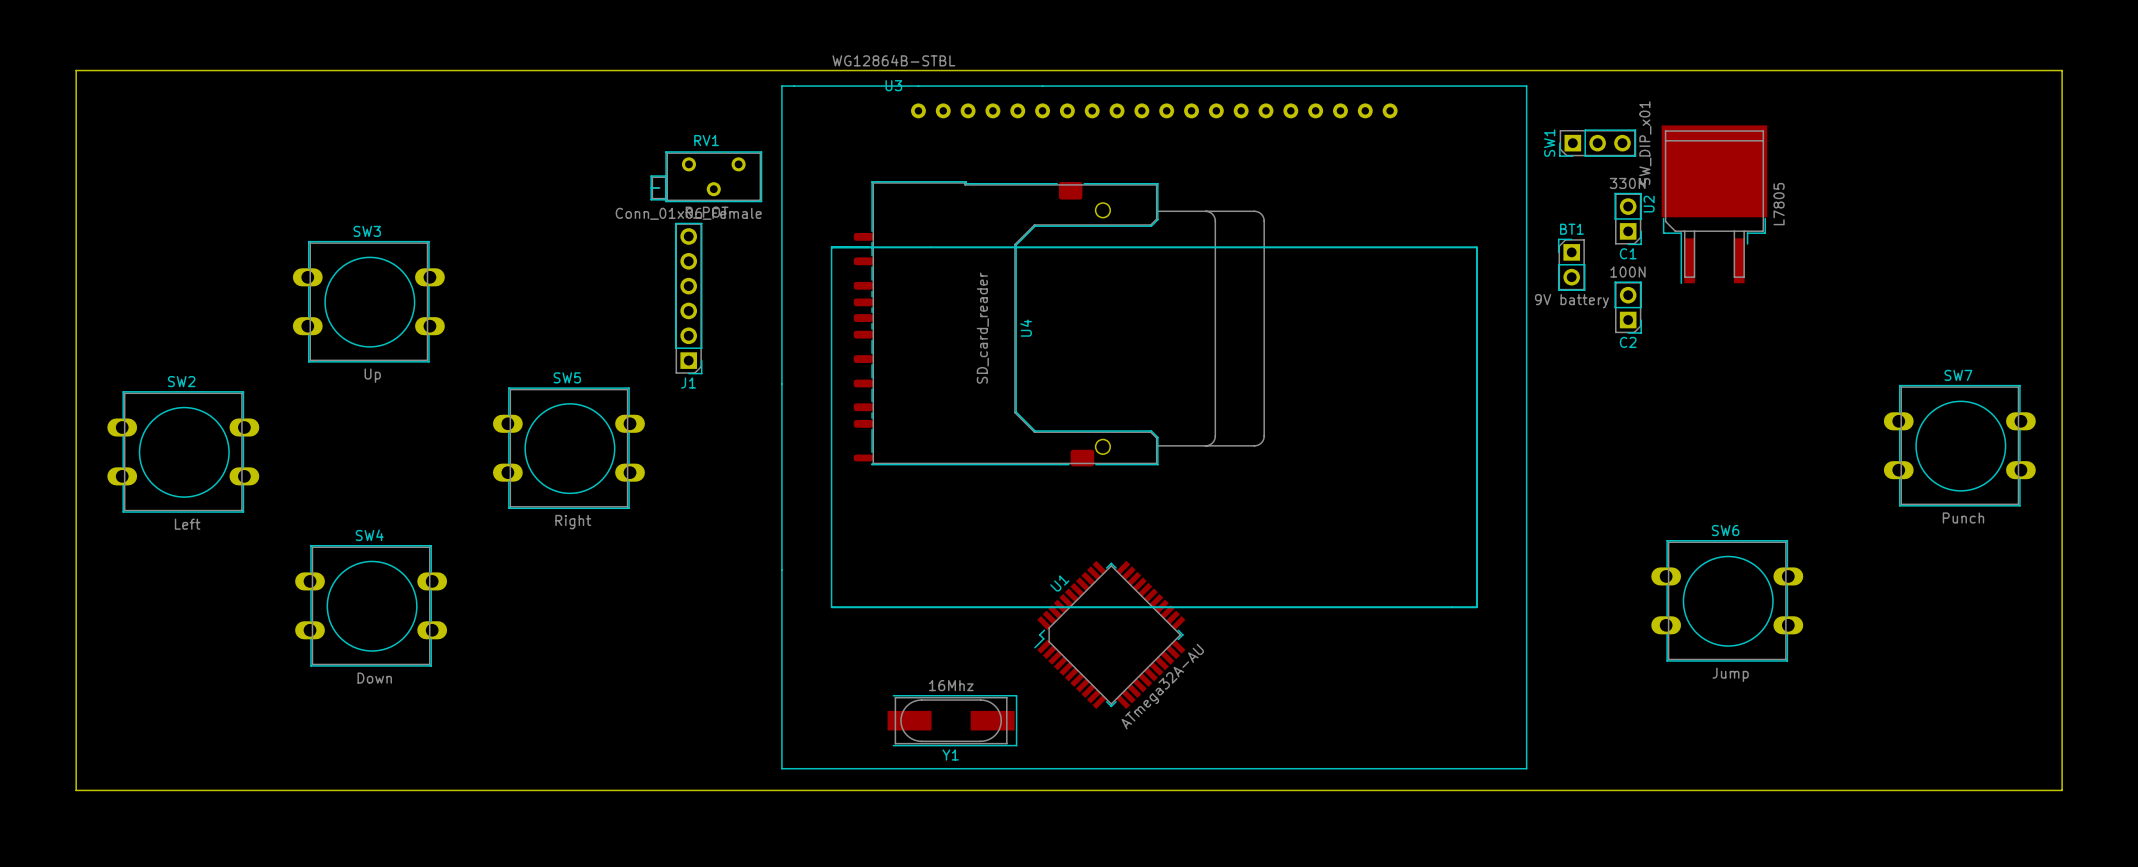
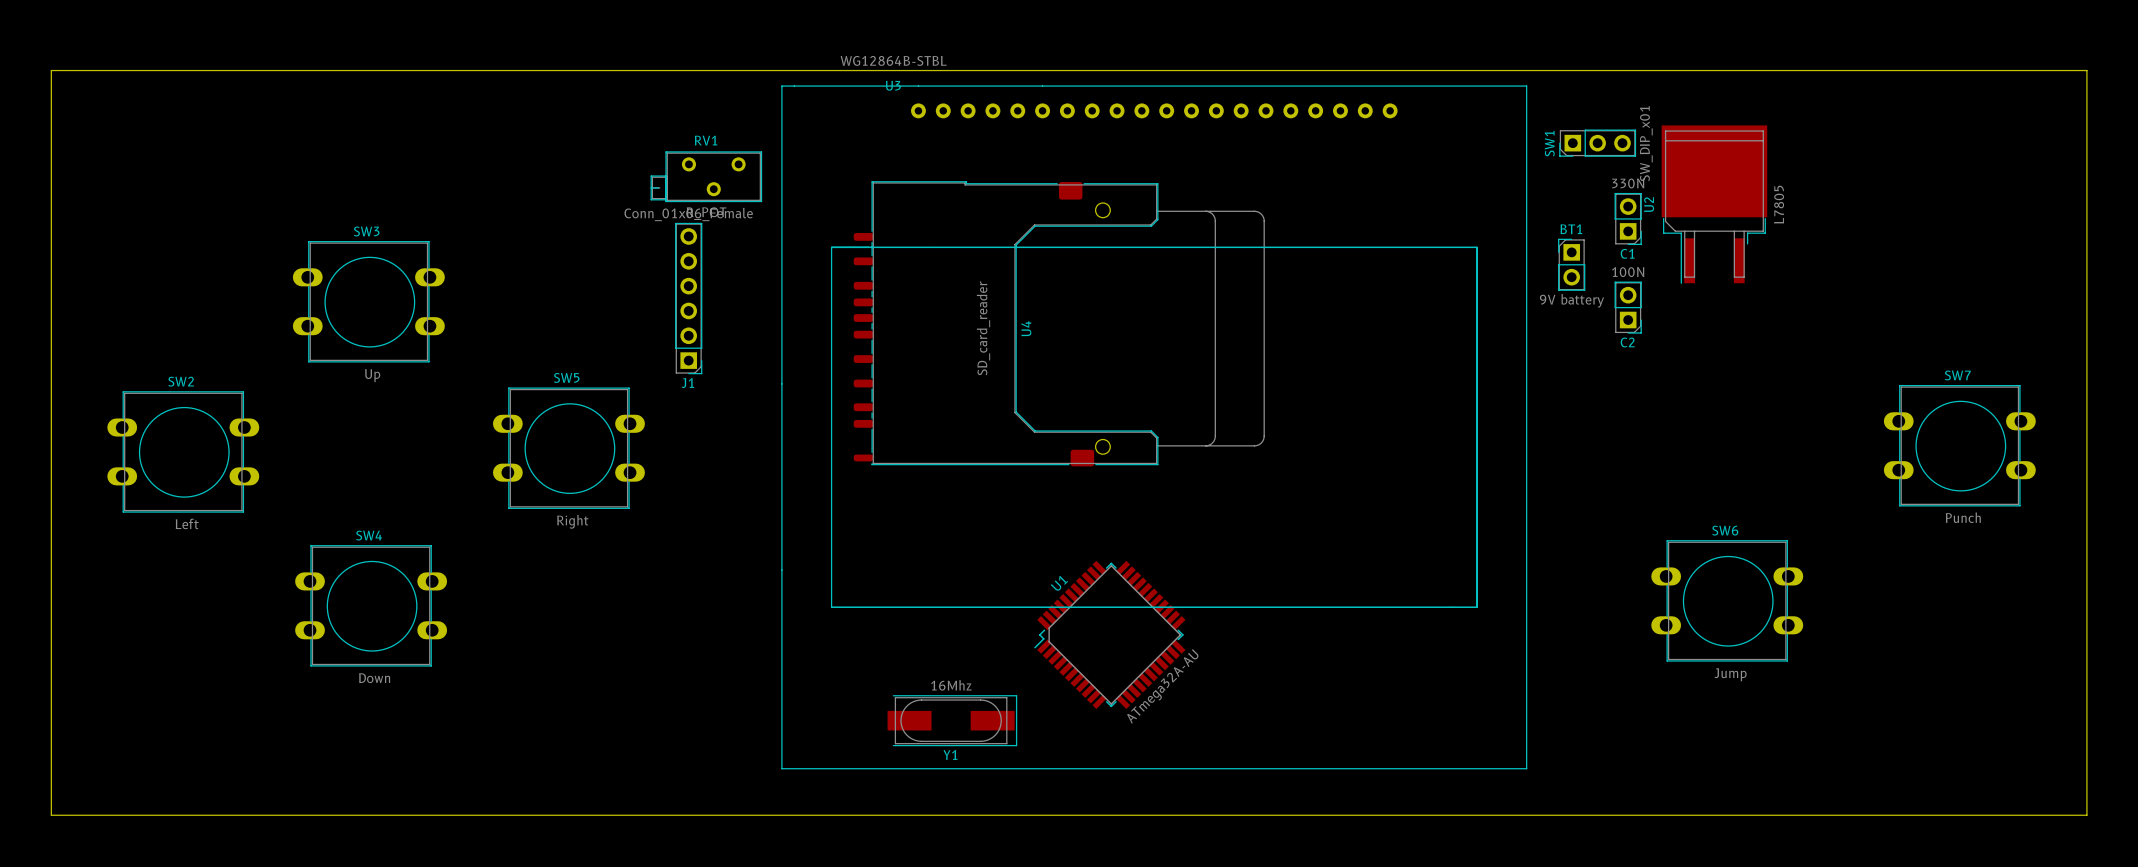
board edge: (76, 70) (76, 790) (2062, 790) (2062, 70) -> (76, 70) (51, 70) (51, 815) (2086, 815) (2086, 70) (2062, 70)

